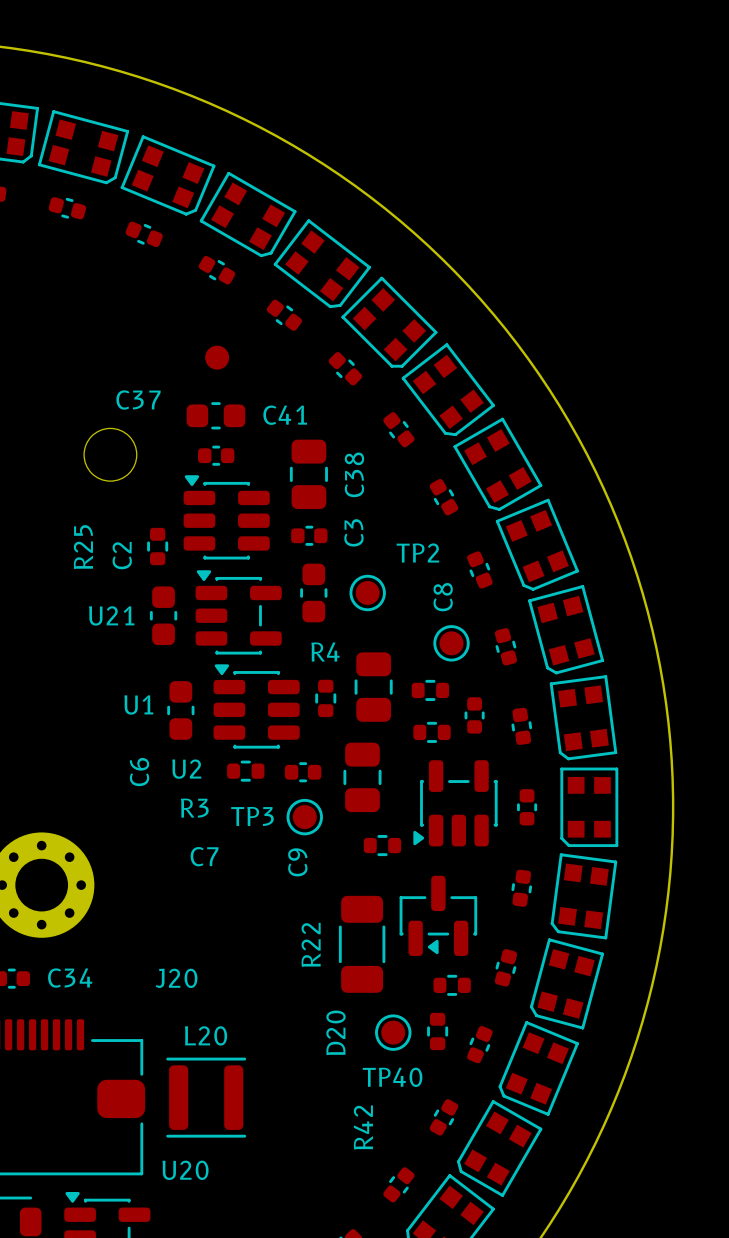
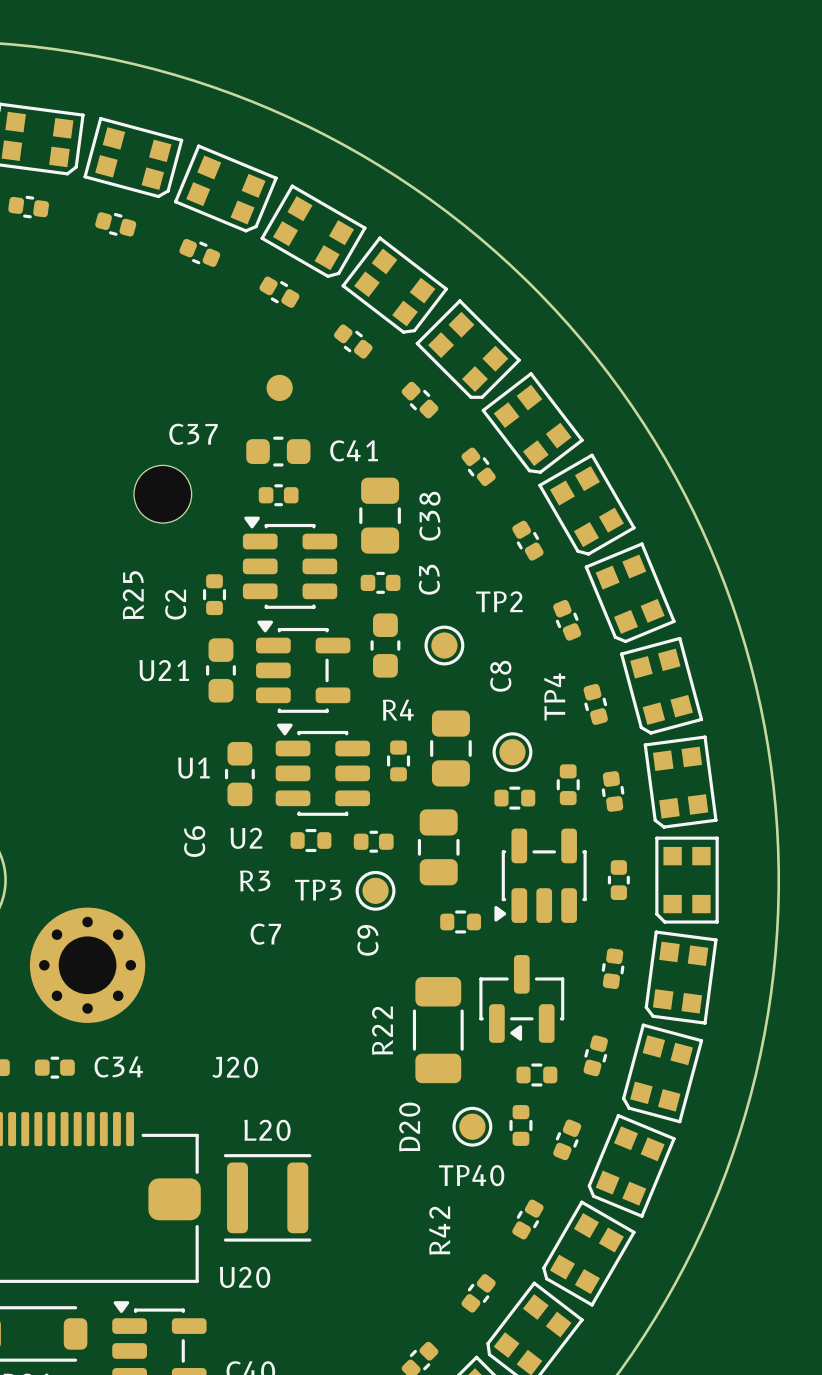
C8 name position: C8 (443, 597) -> C8 (500, 676)
part: (451, 643) -> none
TP4: none -> (512, 752)
part: (430, 690) -> none
part footprint: [464, 697, 485, 734] -> [556, 764, 580, 806]

